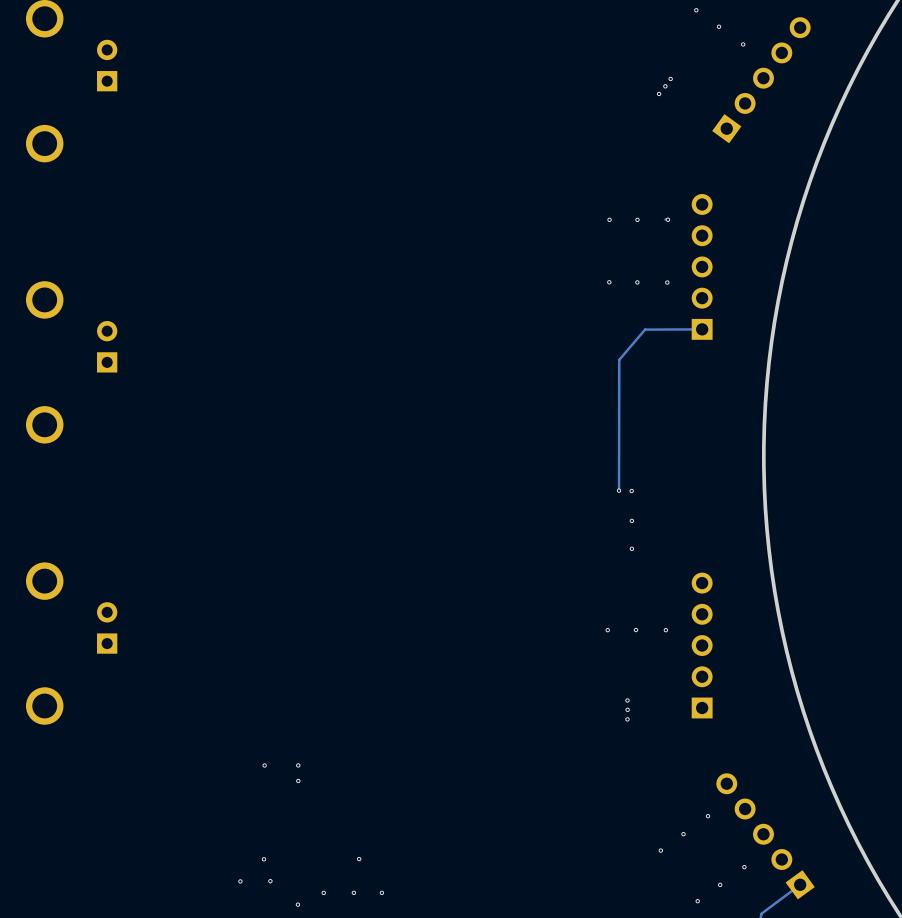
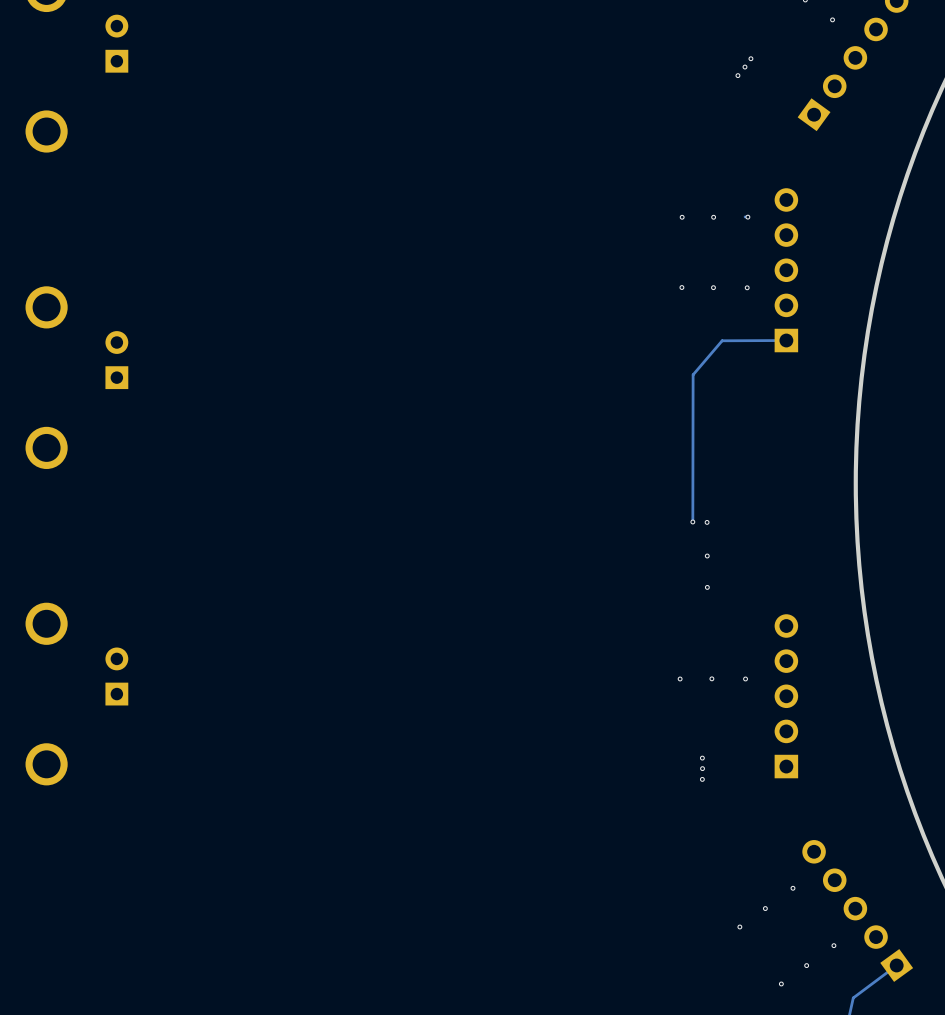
via: (264, 765) -> none
via: (298, 765) -> none
via: (298, 780) -> none
via: (264, 859) -> none
via: (359, 859) -> none
via: (240, 881) -> none
via: (270, 881) -> none
via: (323, 892) -> none
via: (353, 892) -> none
via: (381, 892) -> none
via: (297, 904) -> none

